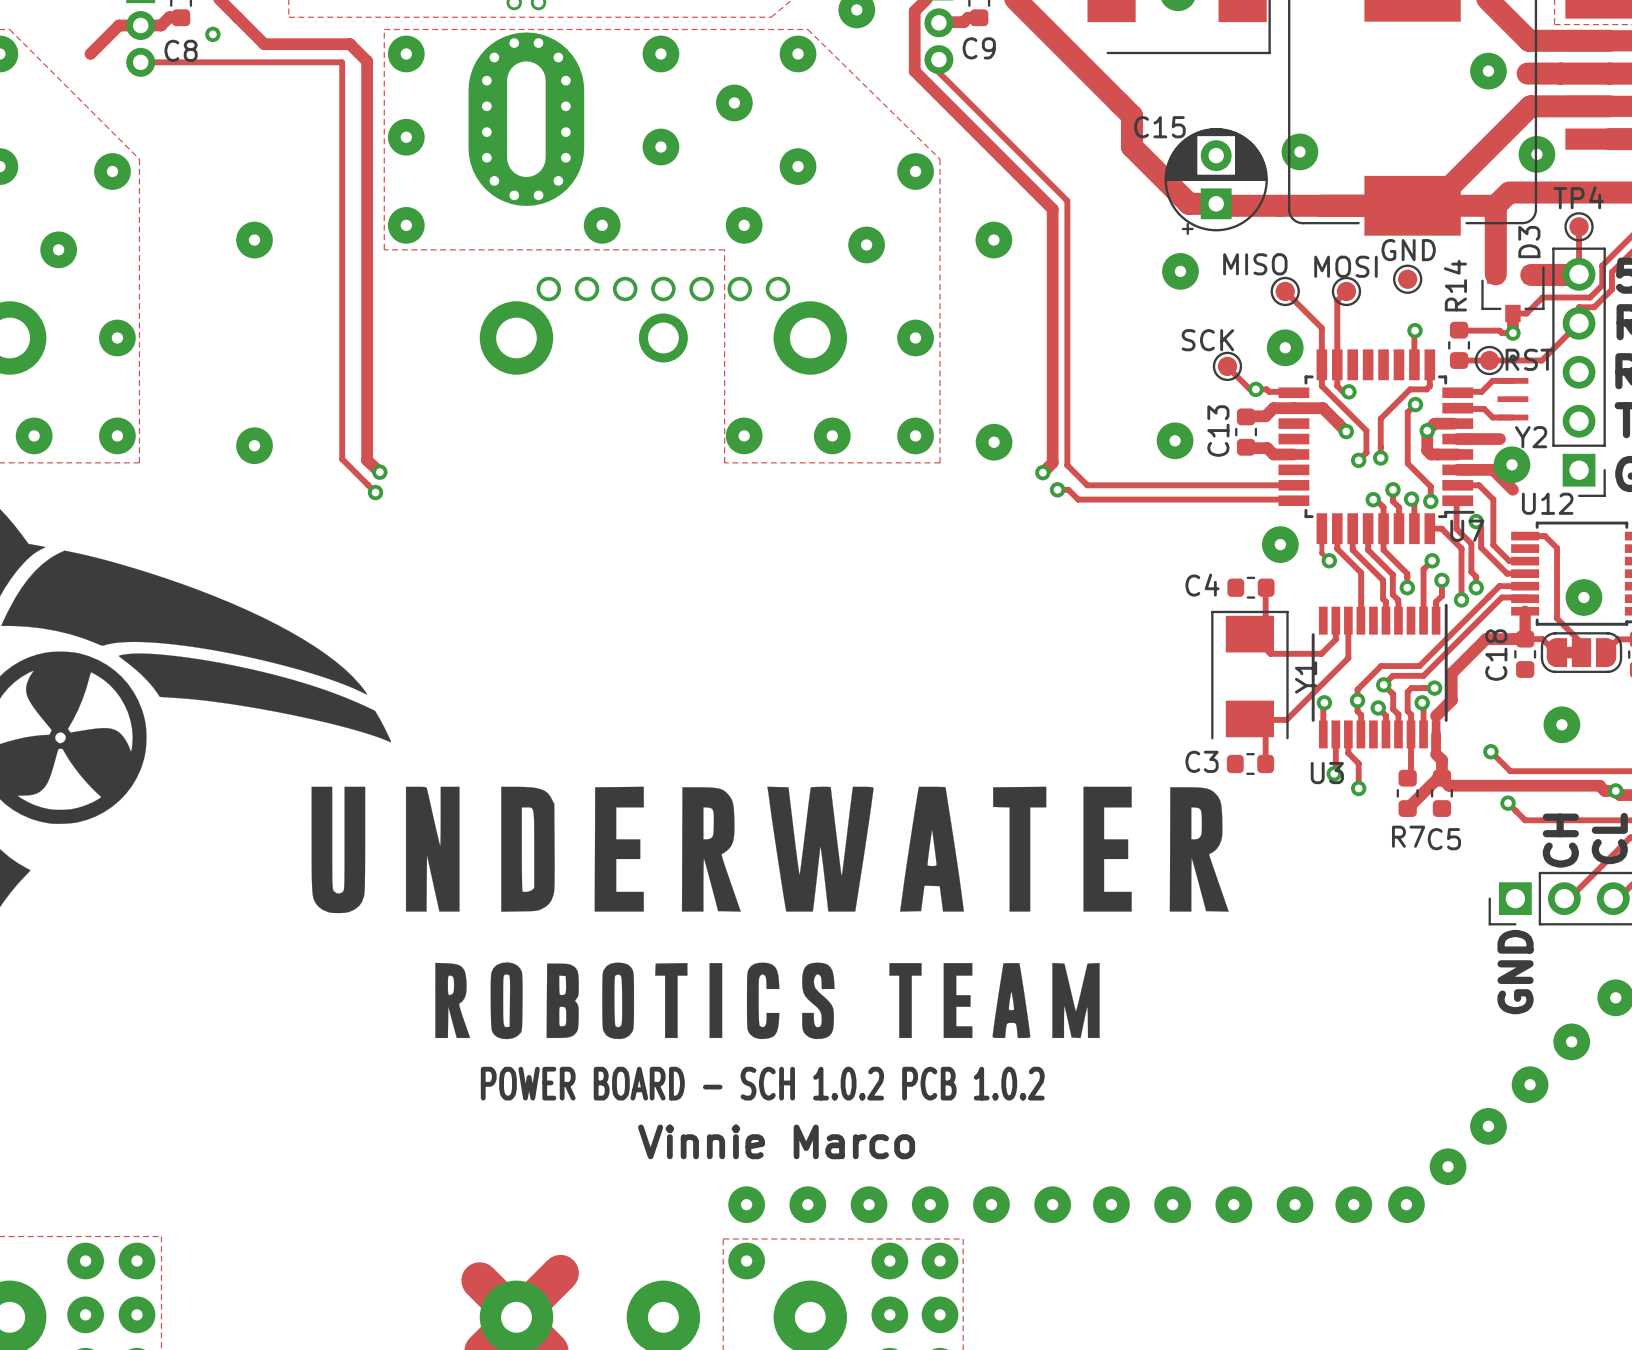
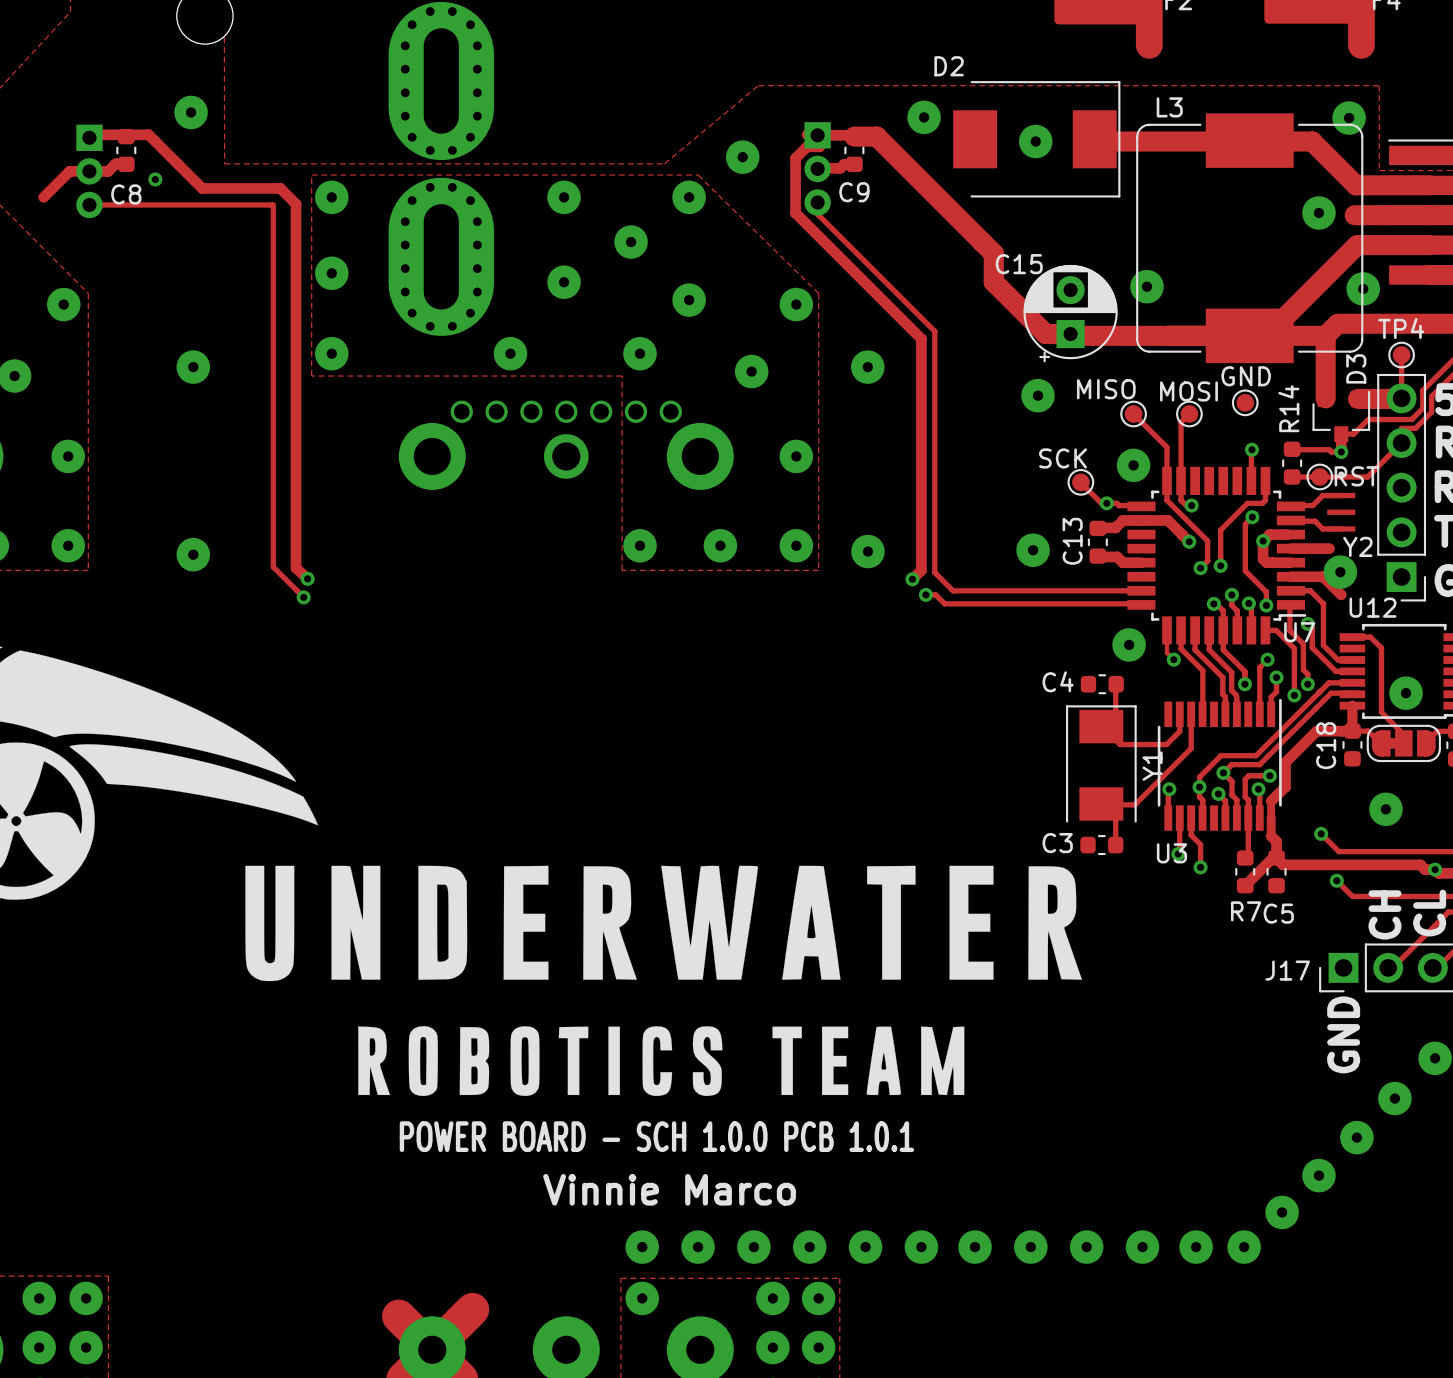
J17 name: none -> J17 (1287, 970)
text: POWER BOARD - SCH 1.0.2 PCB 1.0.2 (762, 1083) -> POWER BOARD - SCH 1.0.0 PCB 1.0.1 (656, 1136)

